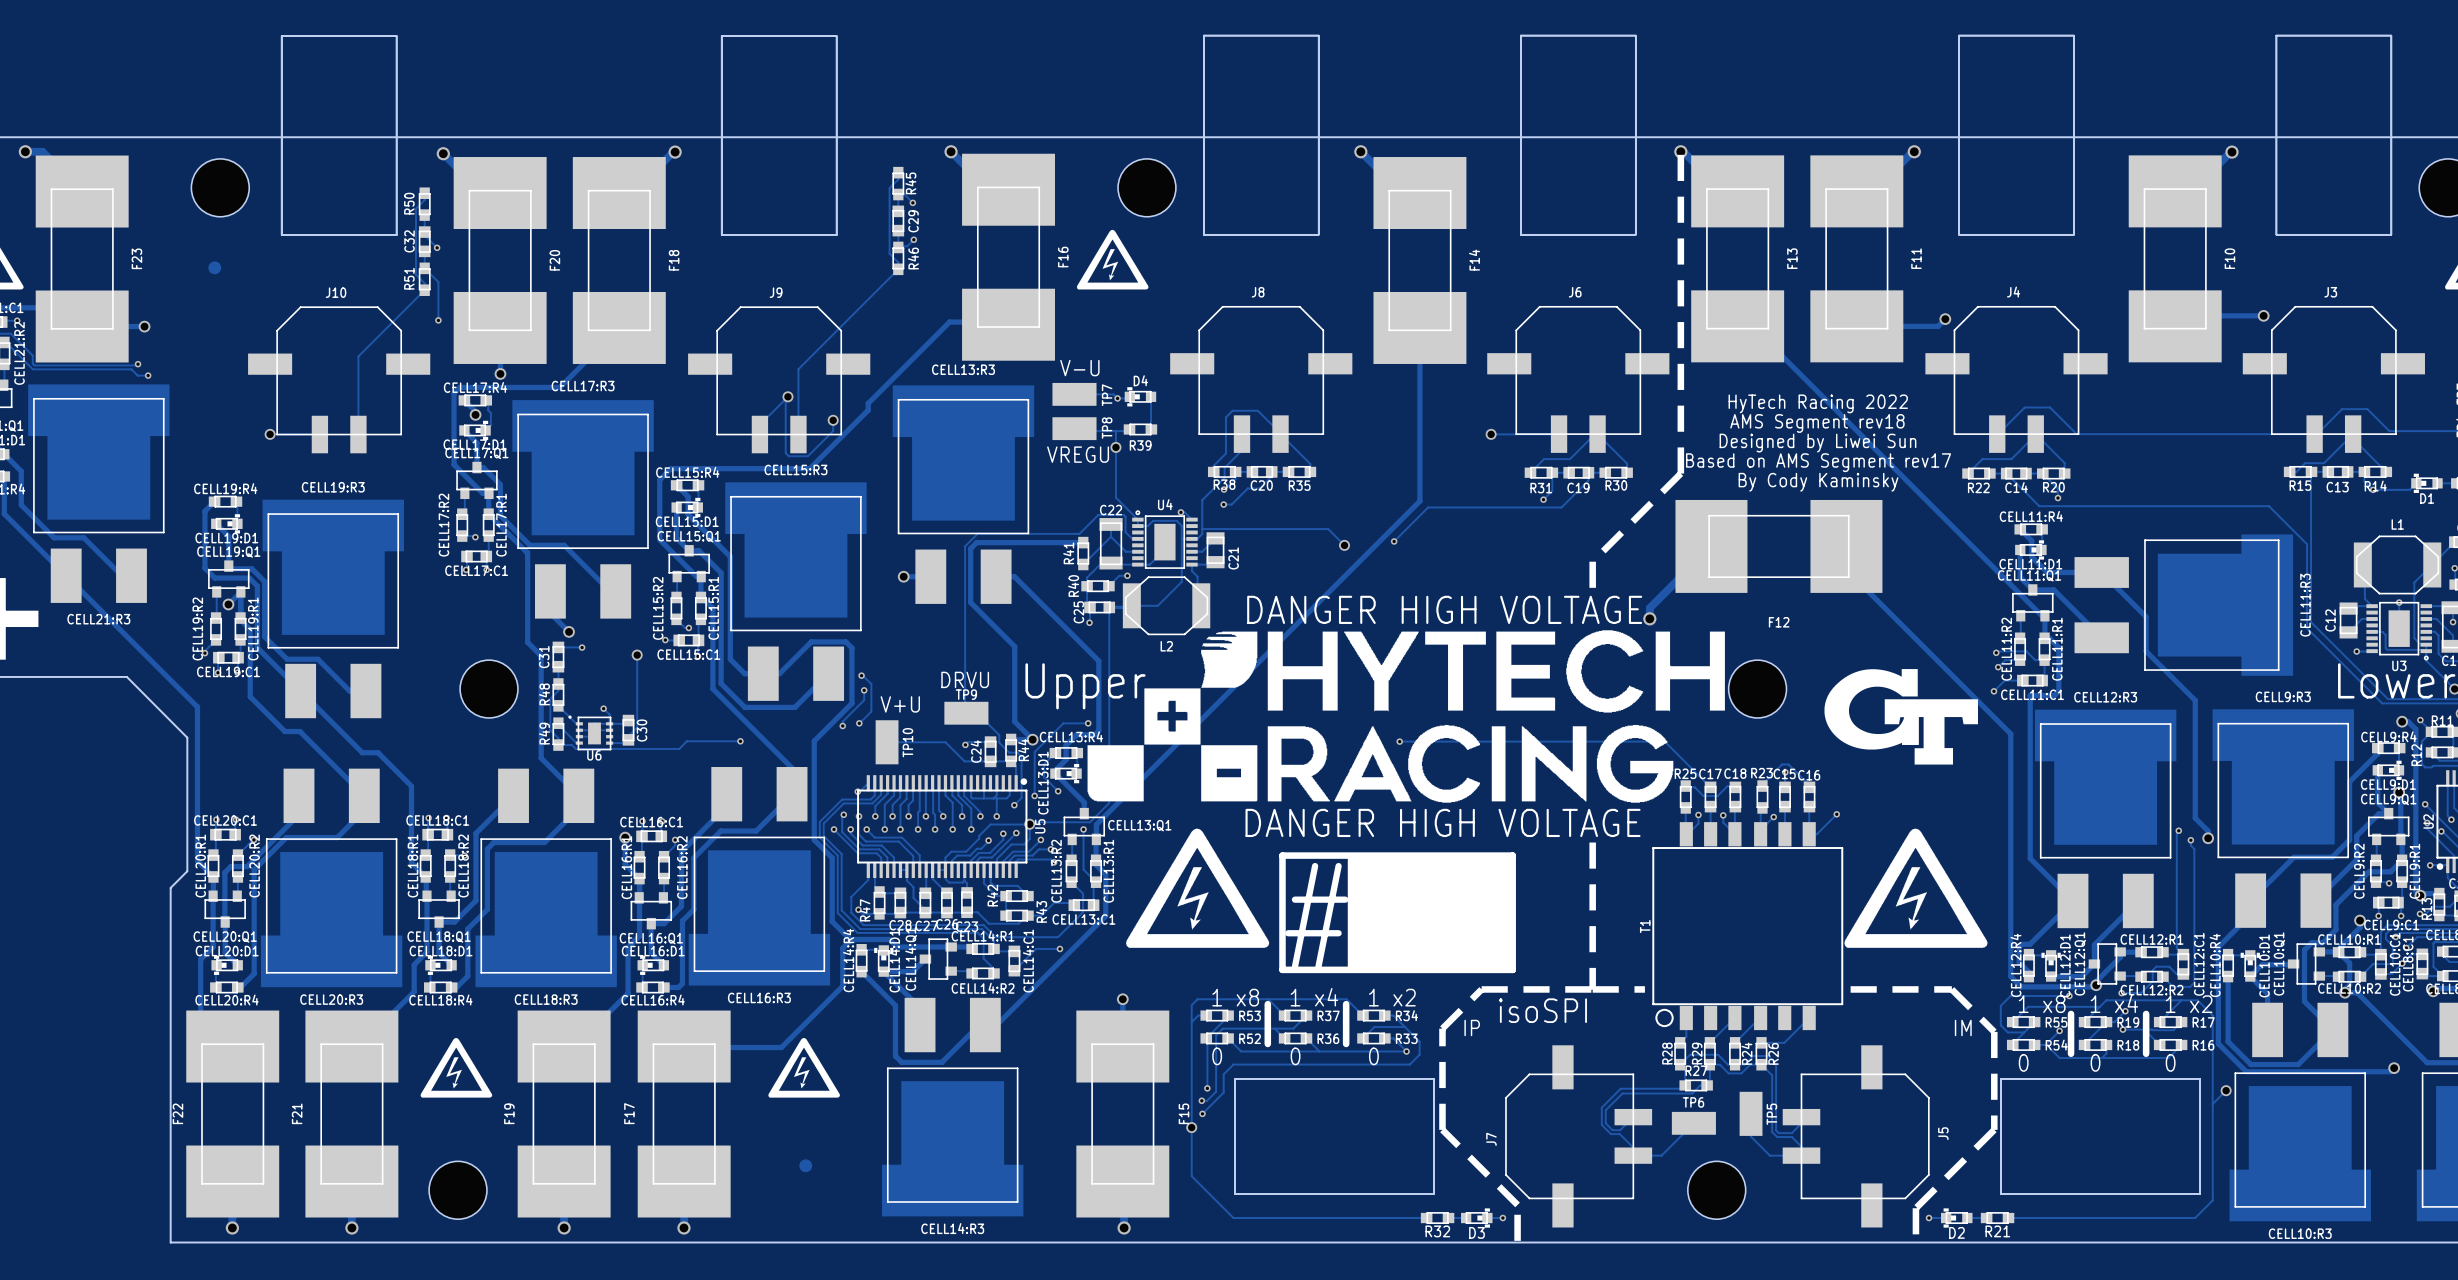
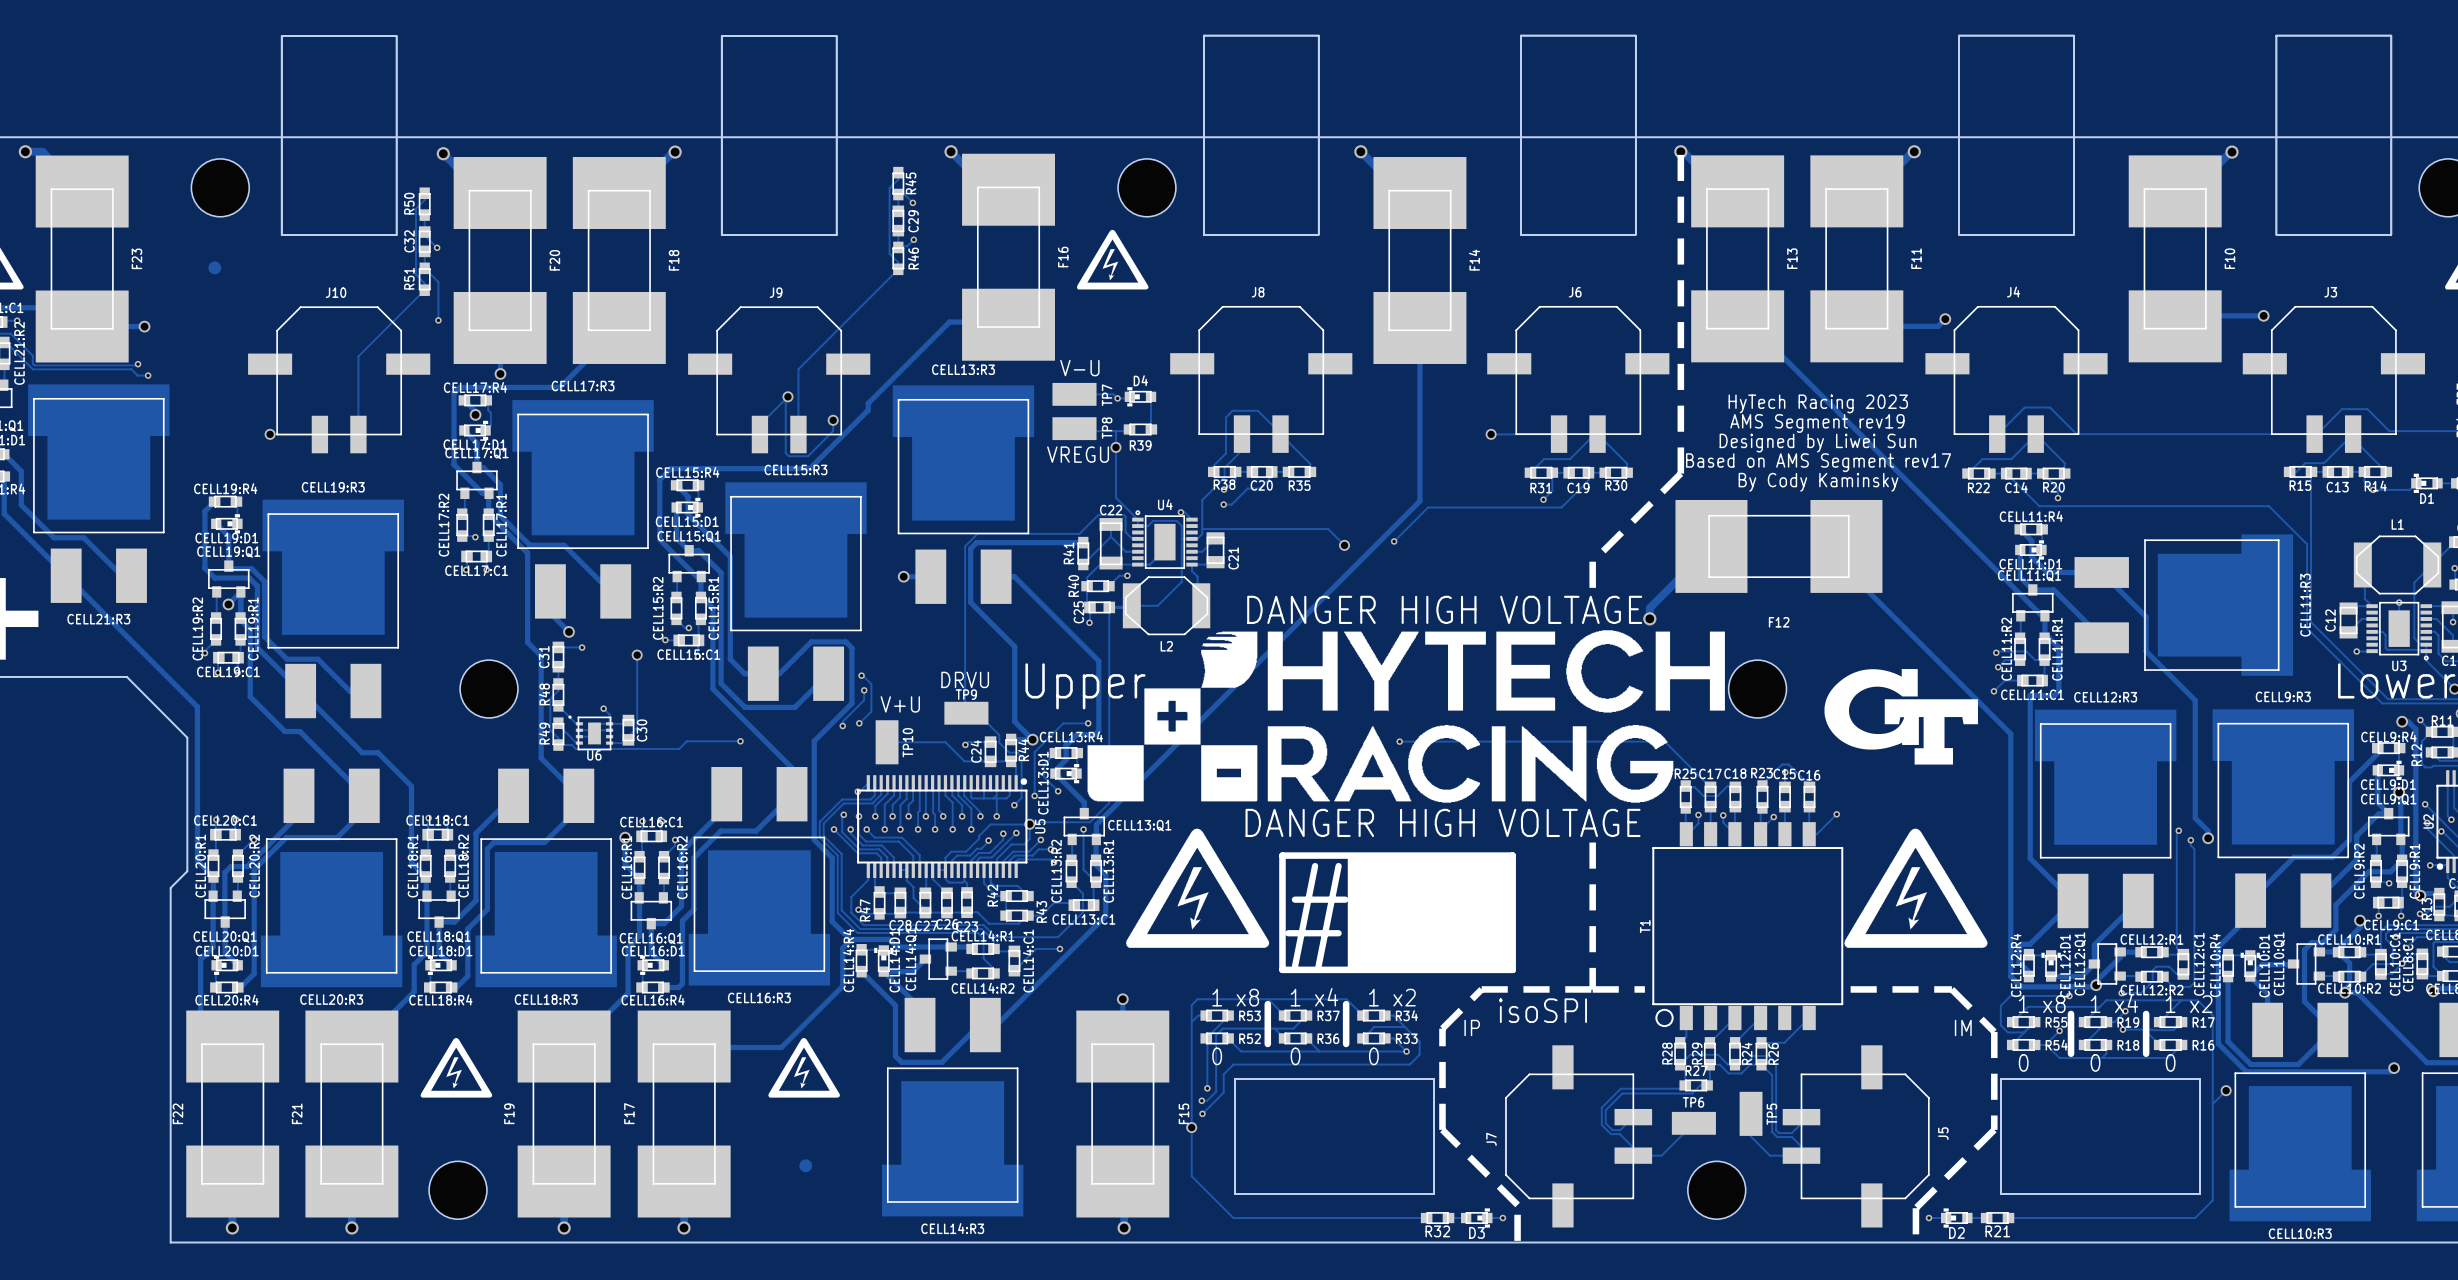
text: HyTech Racing 2022 (1818, 403) -> HyTech Racing 2023 (1818, 403)
text: AMS Segment rev18 (1817, 423) -> AMS Segment rev19 (1817, 423)

